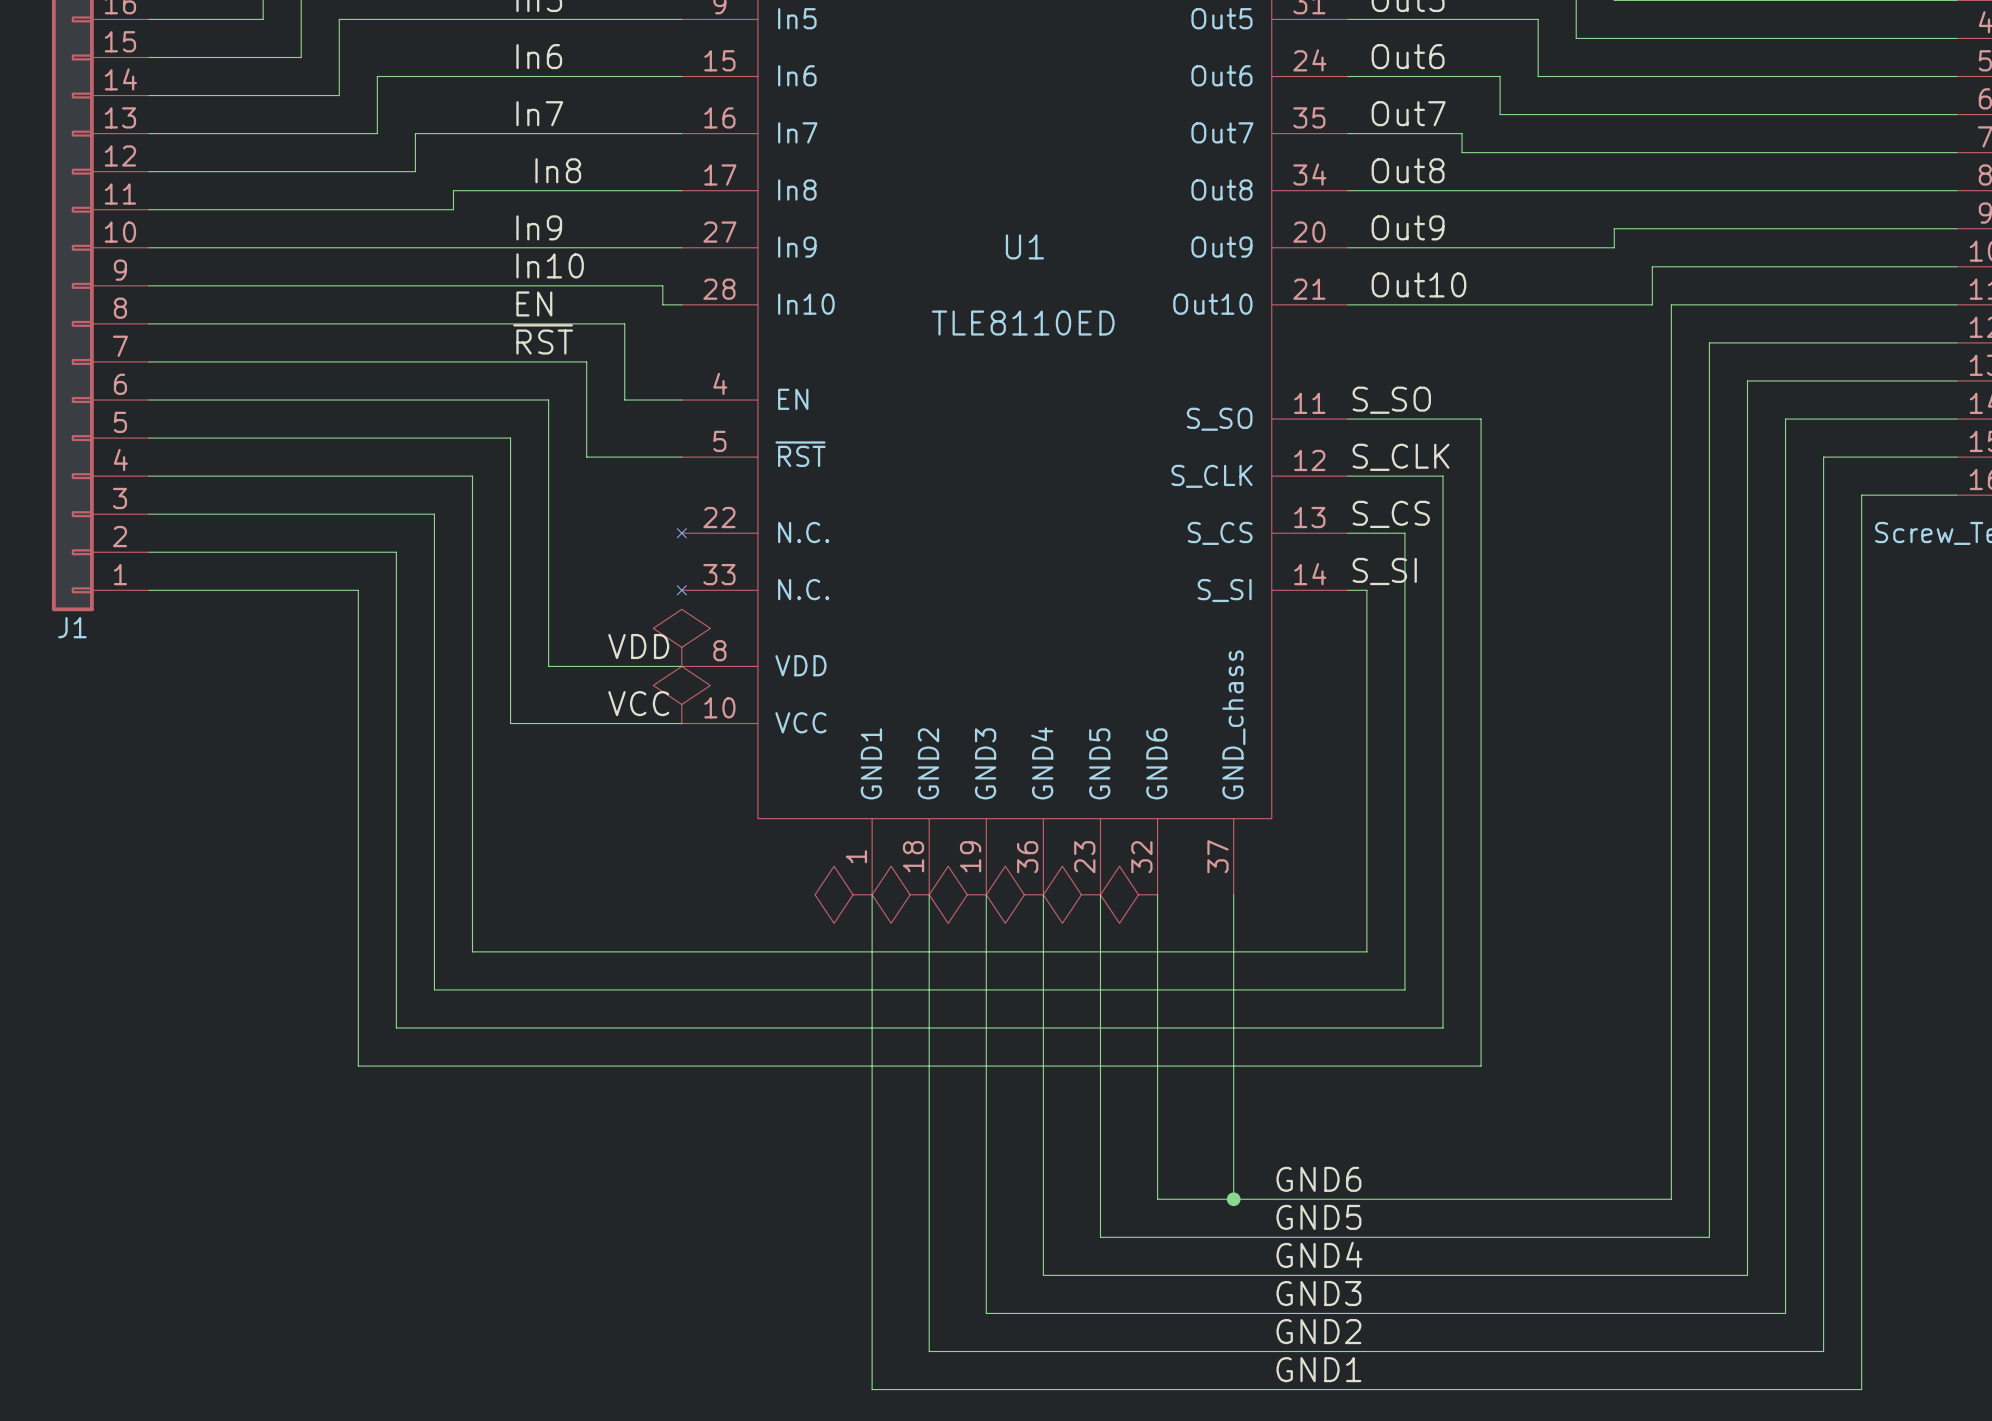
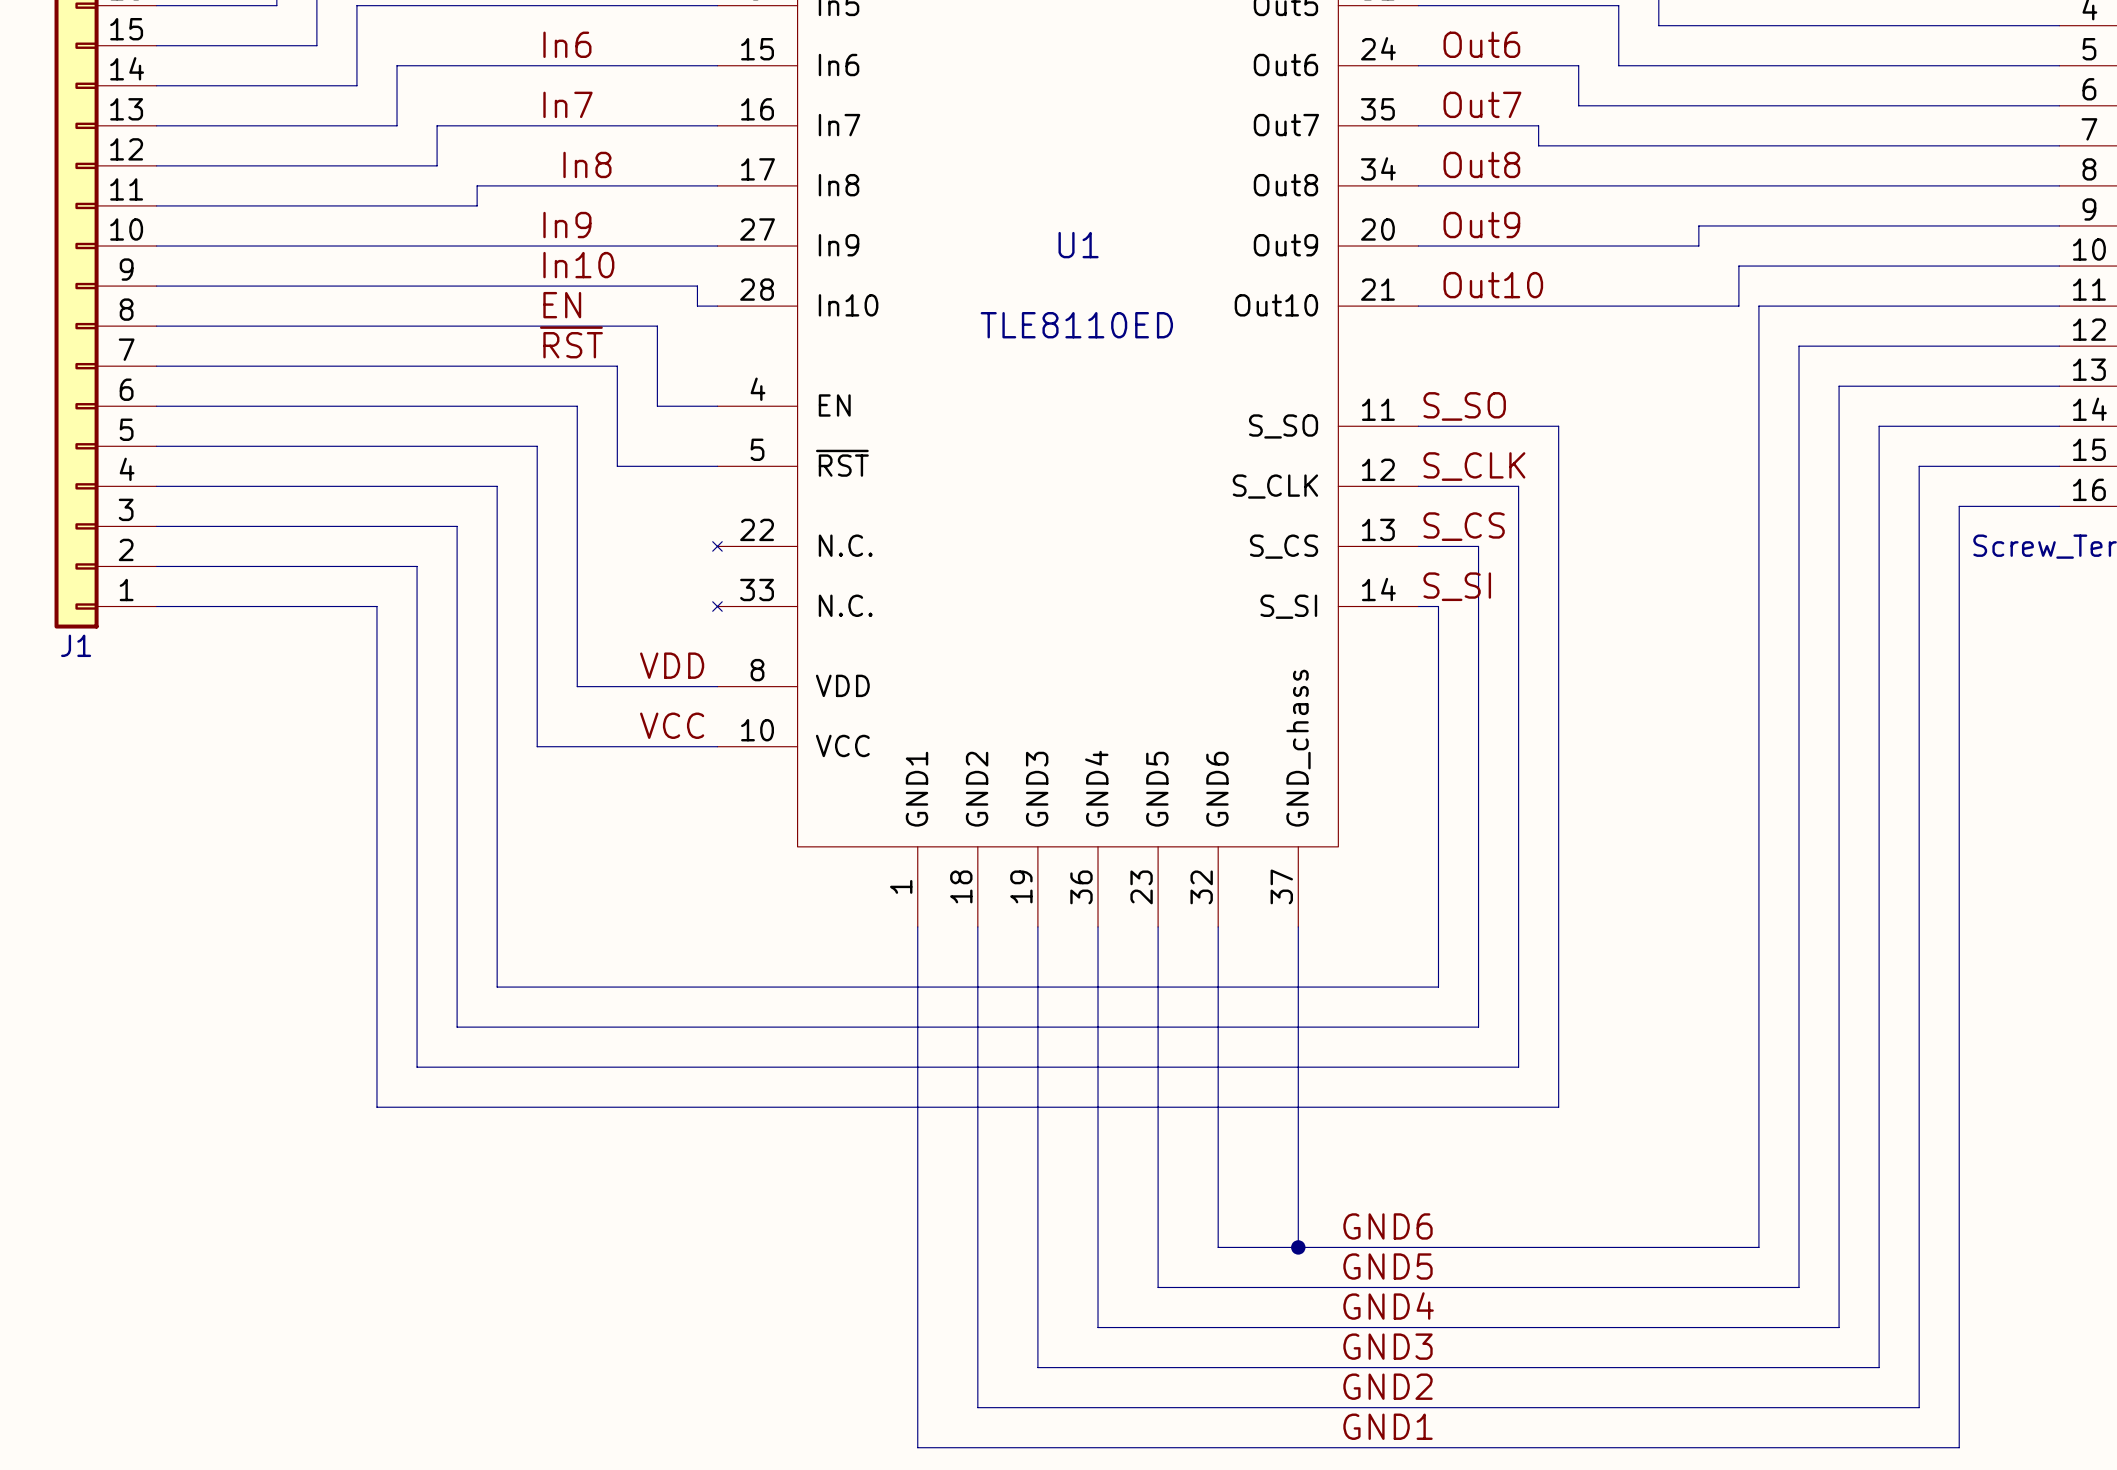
power symbol: (681, 637) -> none
power symbol: (681, 694) -> none
power symbol: (843, 894) -> none
power symbol: (900, 894) -> none
power symbol: (957, 894) -> none
power symbol: (1014, 894) -> none
power symbol: (1071, 894) -> none
power symbol: (1129, 894) -> none

